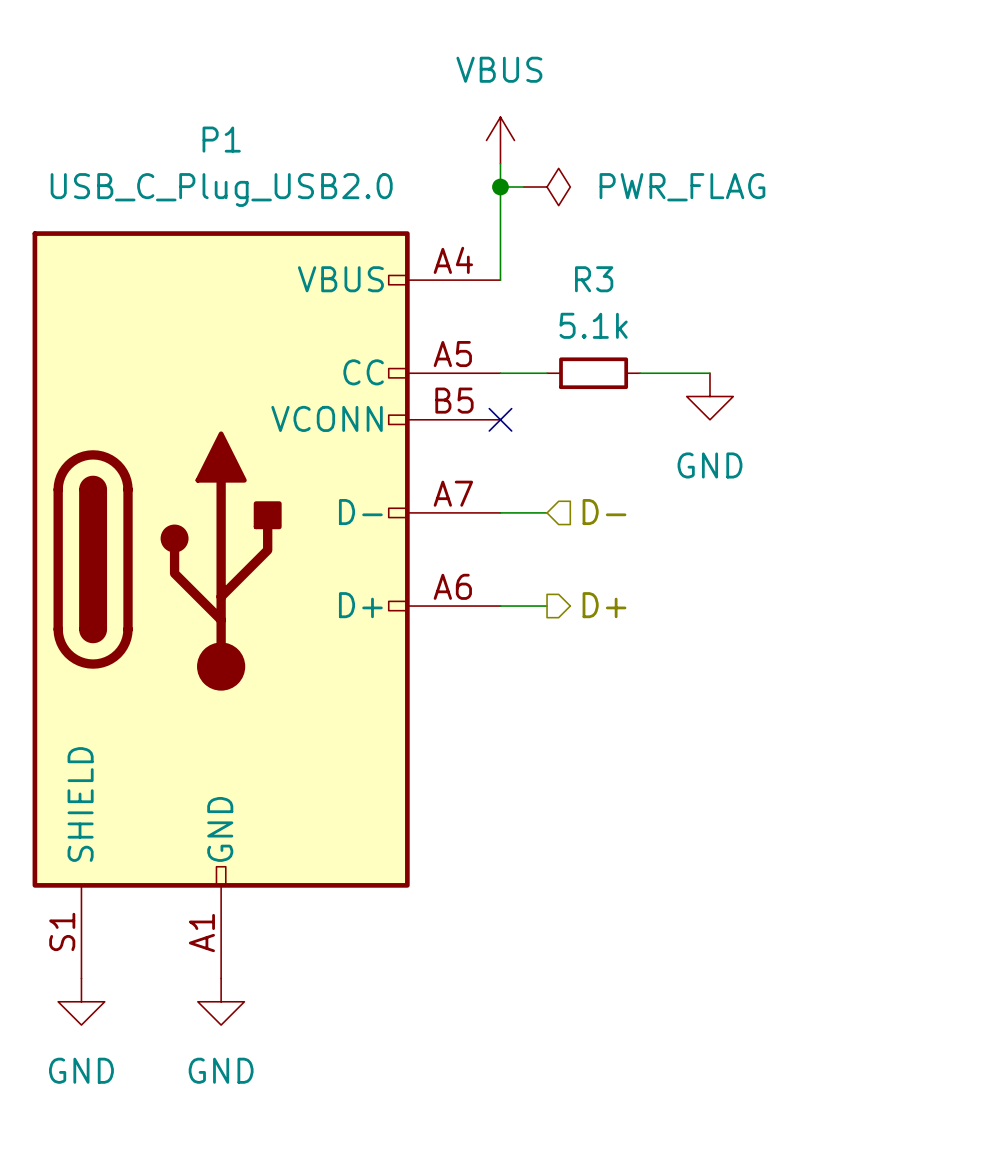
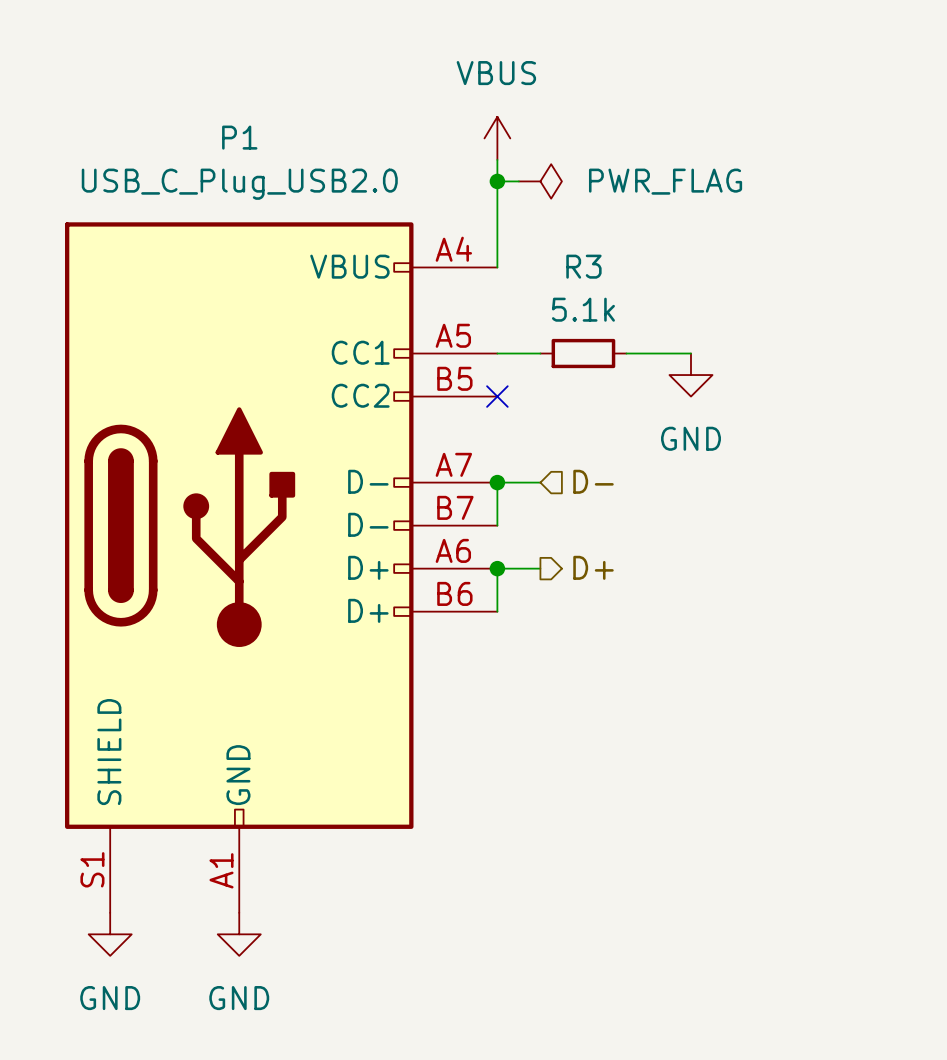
P1 symbol: [32, 231, 501, 979] -> [65, 222, 498, 913]
wire: none -> (497, 482) (497, 525)
junction: none -> (497, 482)
wire: none -> (497, 568) (497, 611)
junction: none -> (497, 568)

